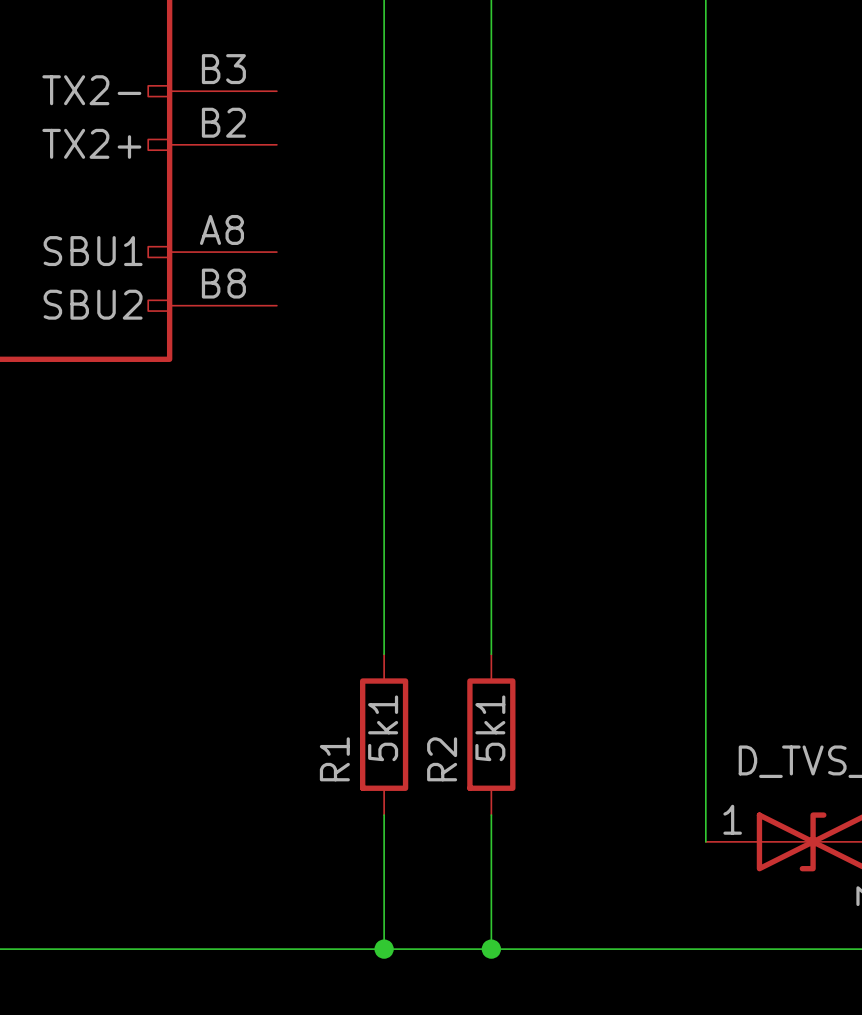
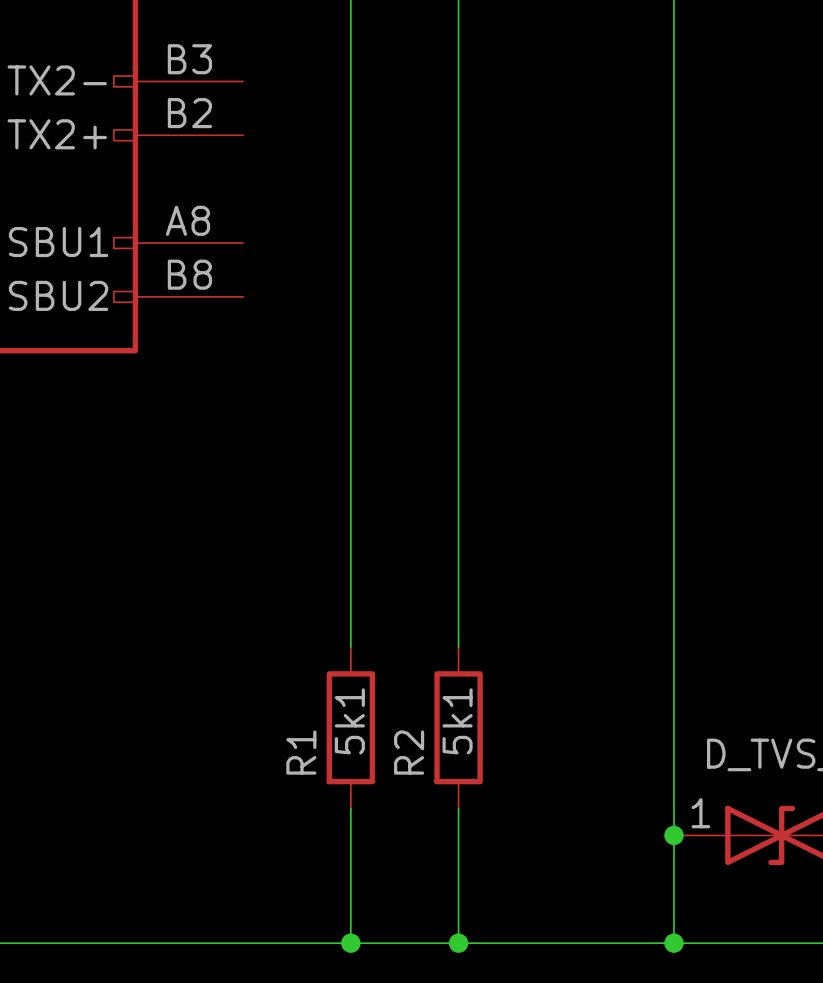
wire: none -> (673, 835) (673, 943)
junction: none -> (673, 835)
junction: none -> (673, 943)

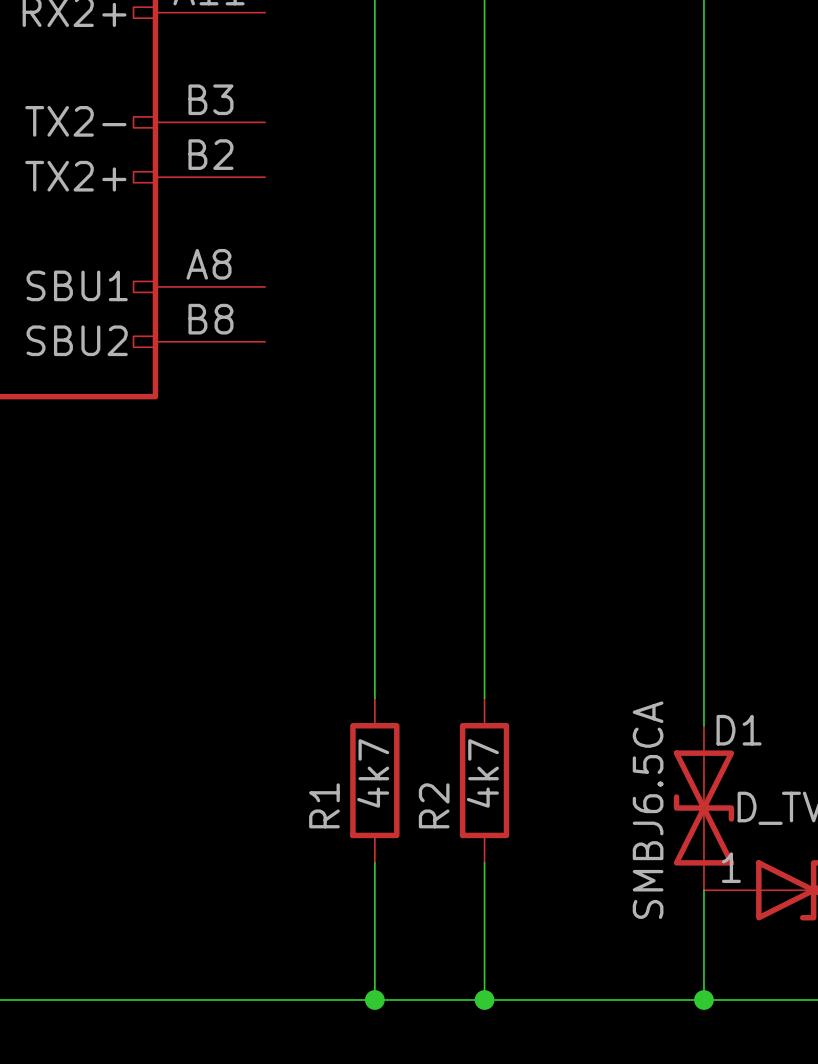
R1 value: 5k1 (349, 721) -> 4k7 (373, 773)
R2 value: 5k1 (457, 721) -> 4k7 (482, 773)
D1: none -> SMBJ6.5CA (703, 808)
junction: (673, 835) -> none

